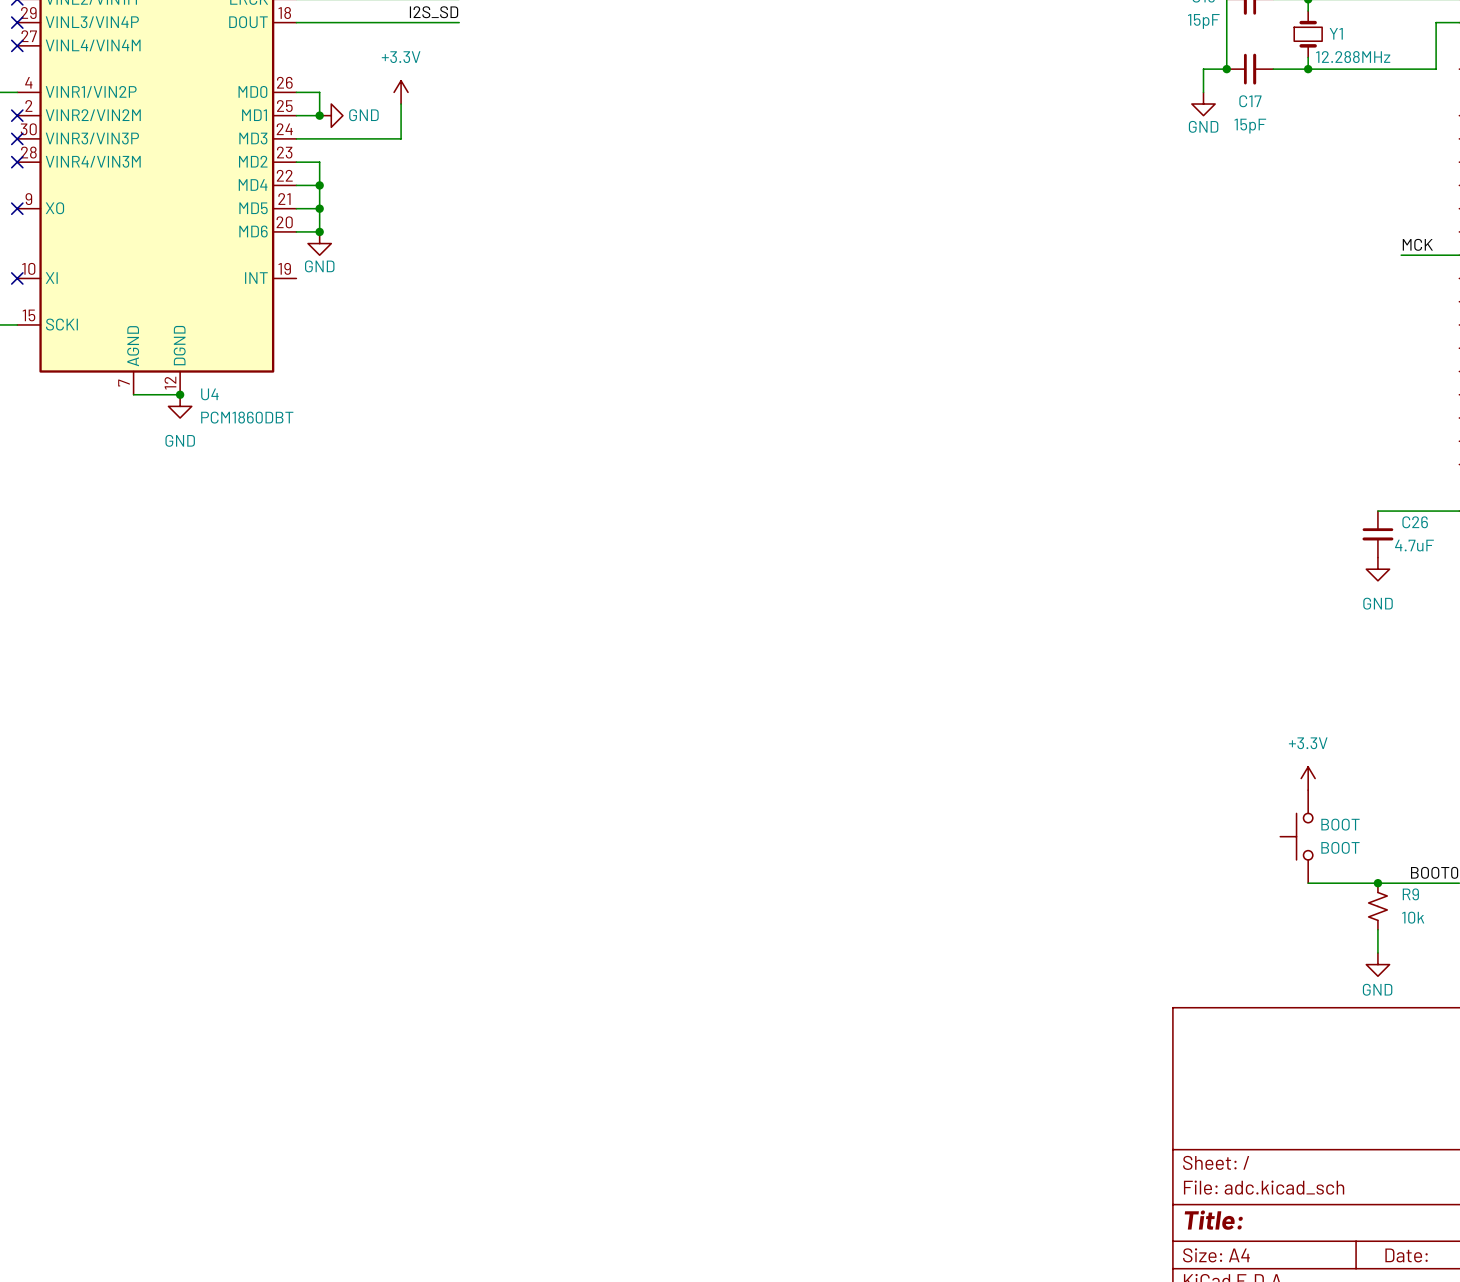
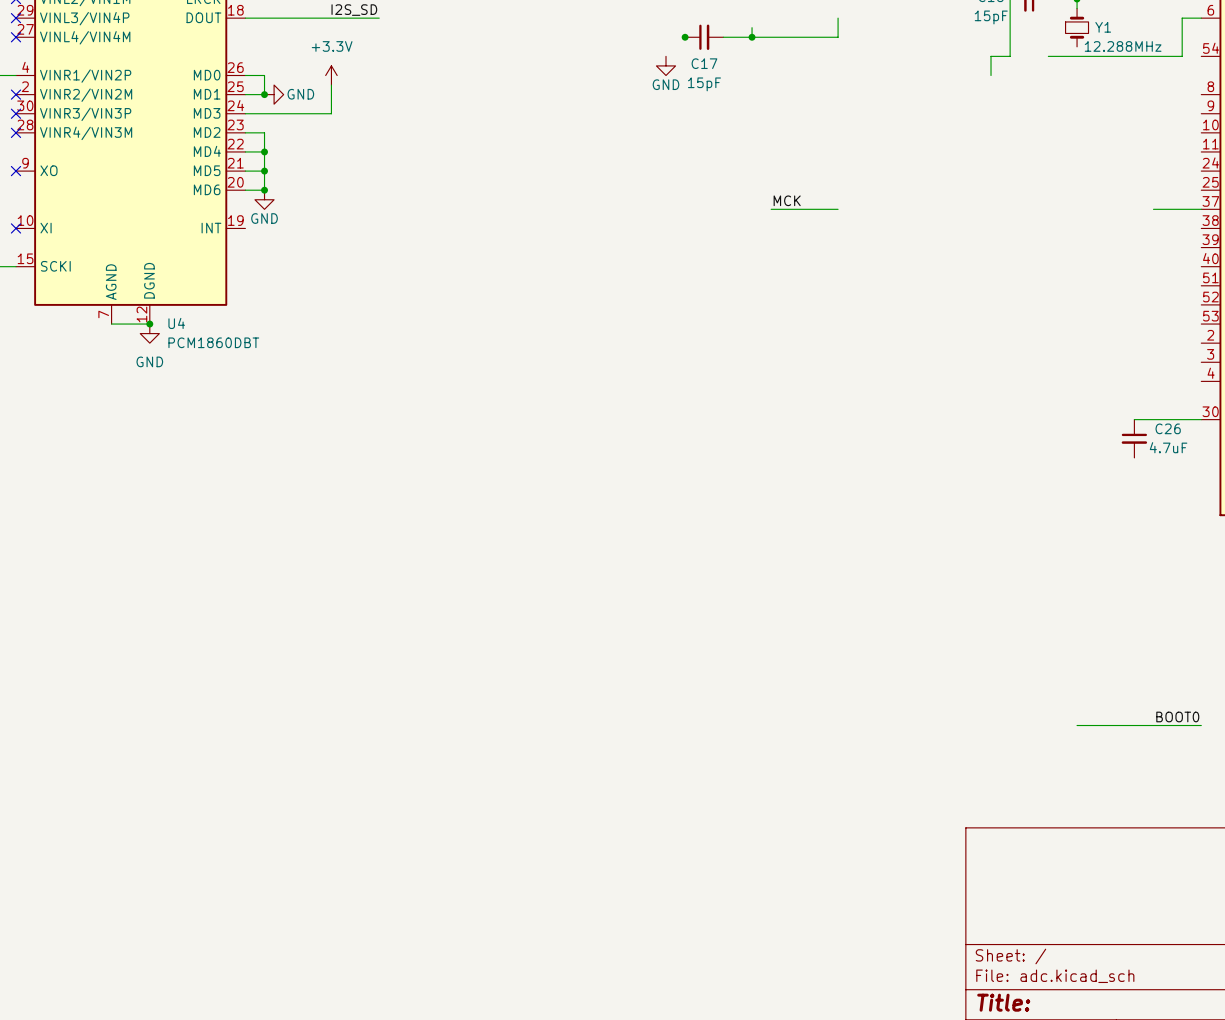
wire: none -> (838, 18) (838, 37) (723, 37)
wire: none -> (752, 27) (752, 37)
junction: none -> (685, 37)
junction: none -> (752, 37)
wire: (1308, 57) (1308, 69) -> none
junction: (1226, 69) -> none
C17 position: (1250, 69) -> (704, 37)
junction: (1308, 69) -> none
power symbol: none -> GND (666, 65)
power symbol: GND (1203, 104) -> none
label: none -> MCK (787, 200)
label: MCK (1417, 244) -> none
wire: none -> (771, 209) (838, 209)
power symbol: GND (1377, 569) -> none
power symbol: +3.3V (1308, 778) -> none
BOOT: BOOT (1296, 836) -> none
junction: (1377, 883) -> none
R9: 10k (1377, 906) -> none
wire: (1377, 929) (1377, 952) -> none
power symbol: GND (1377, 964) -> none

